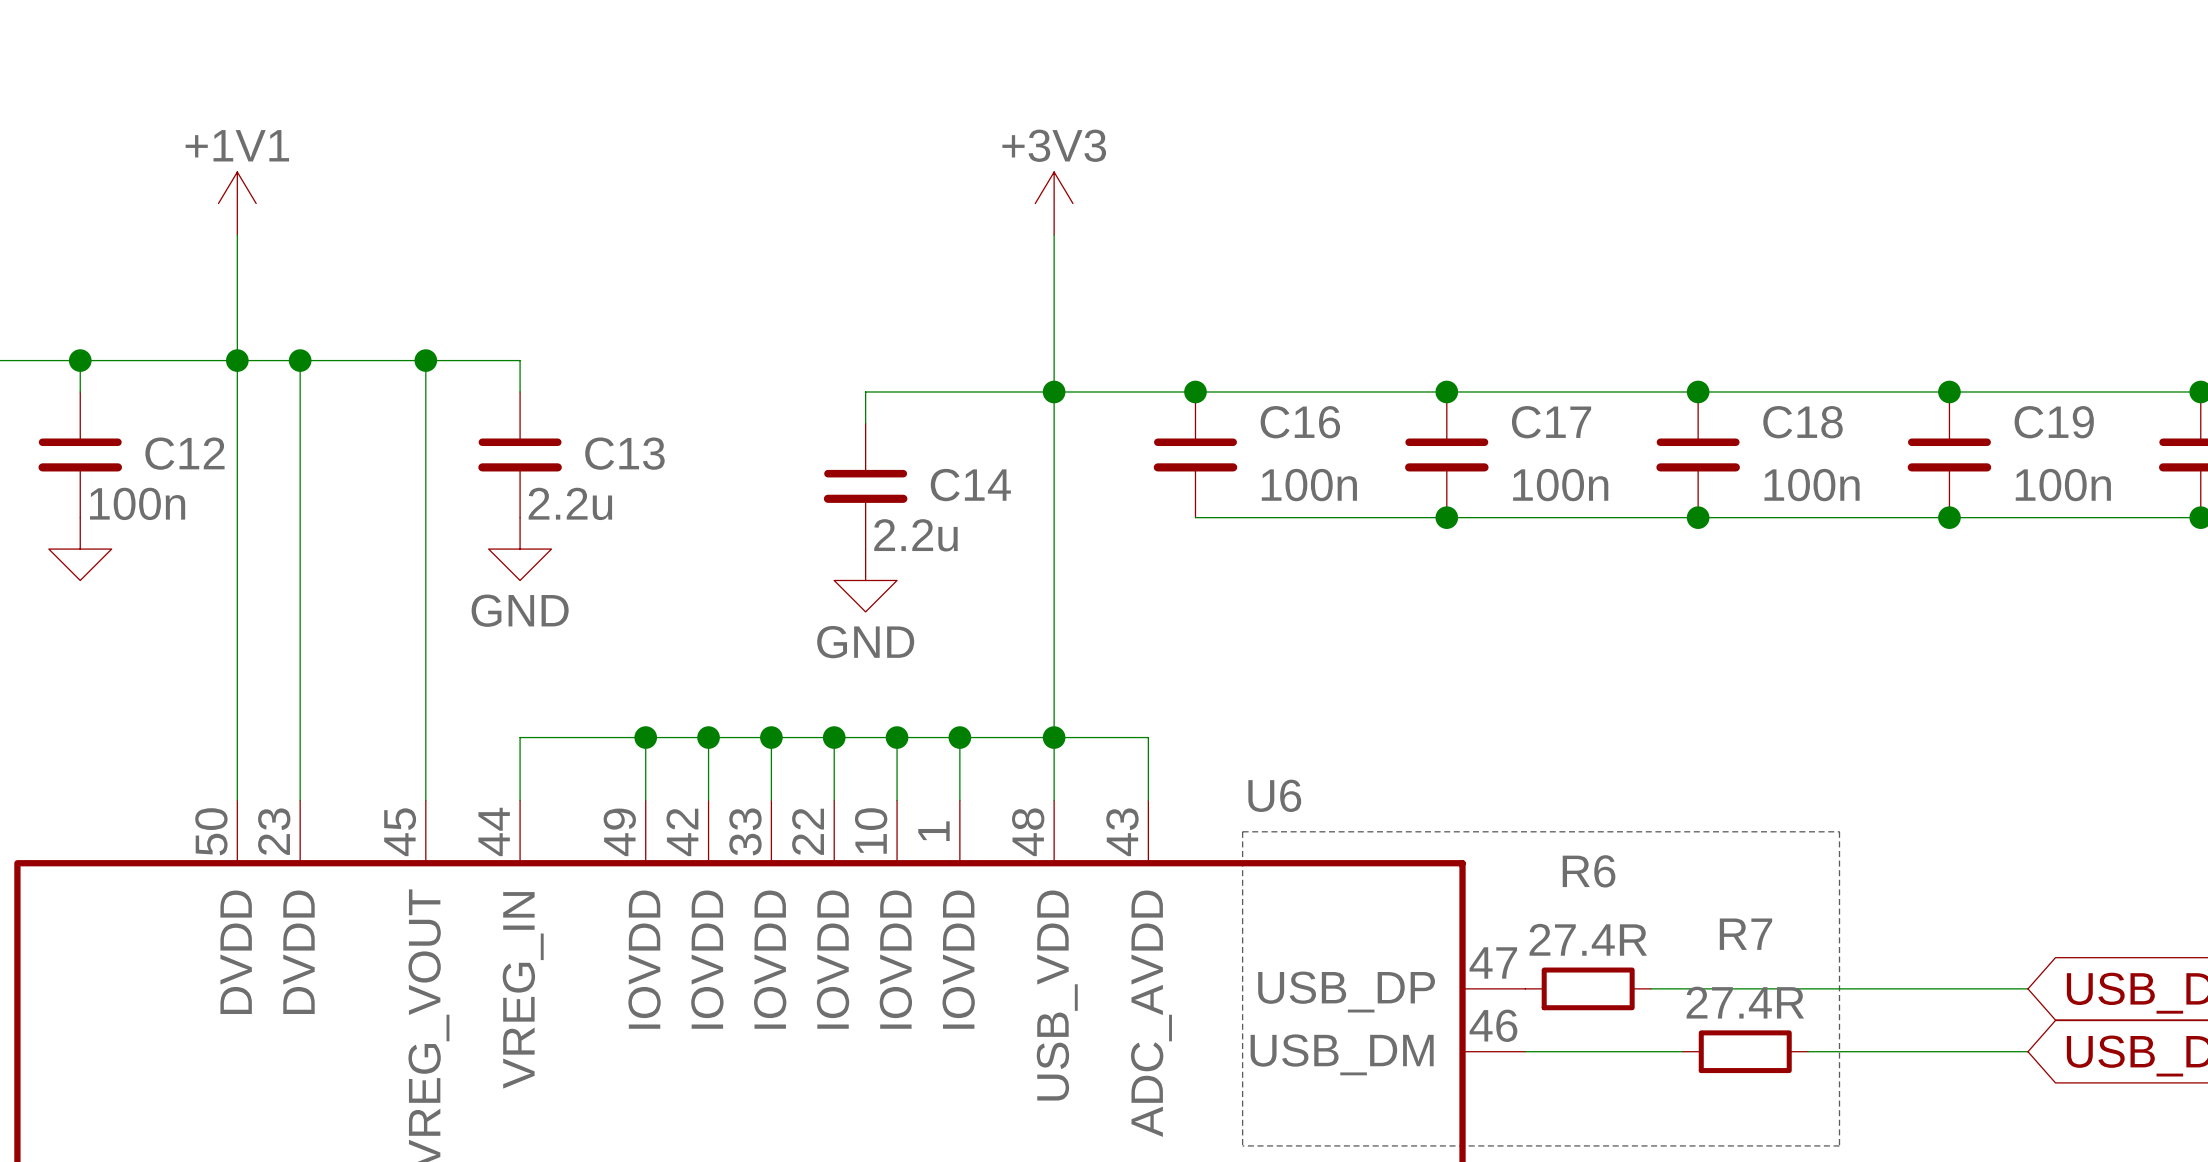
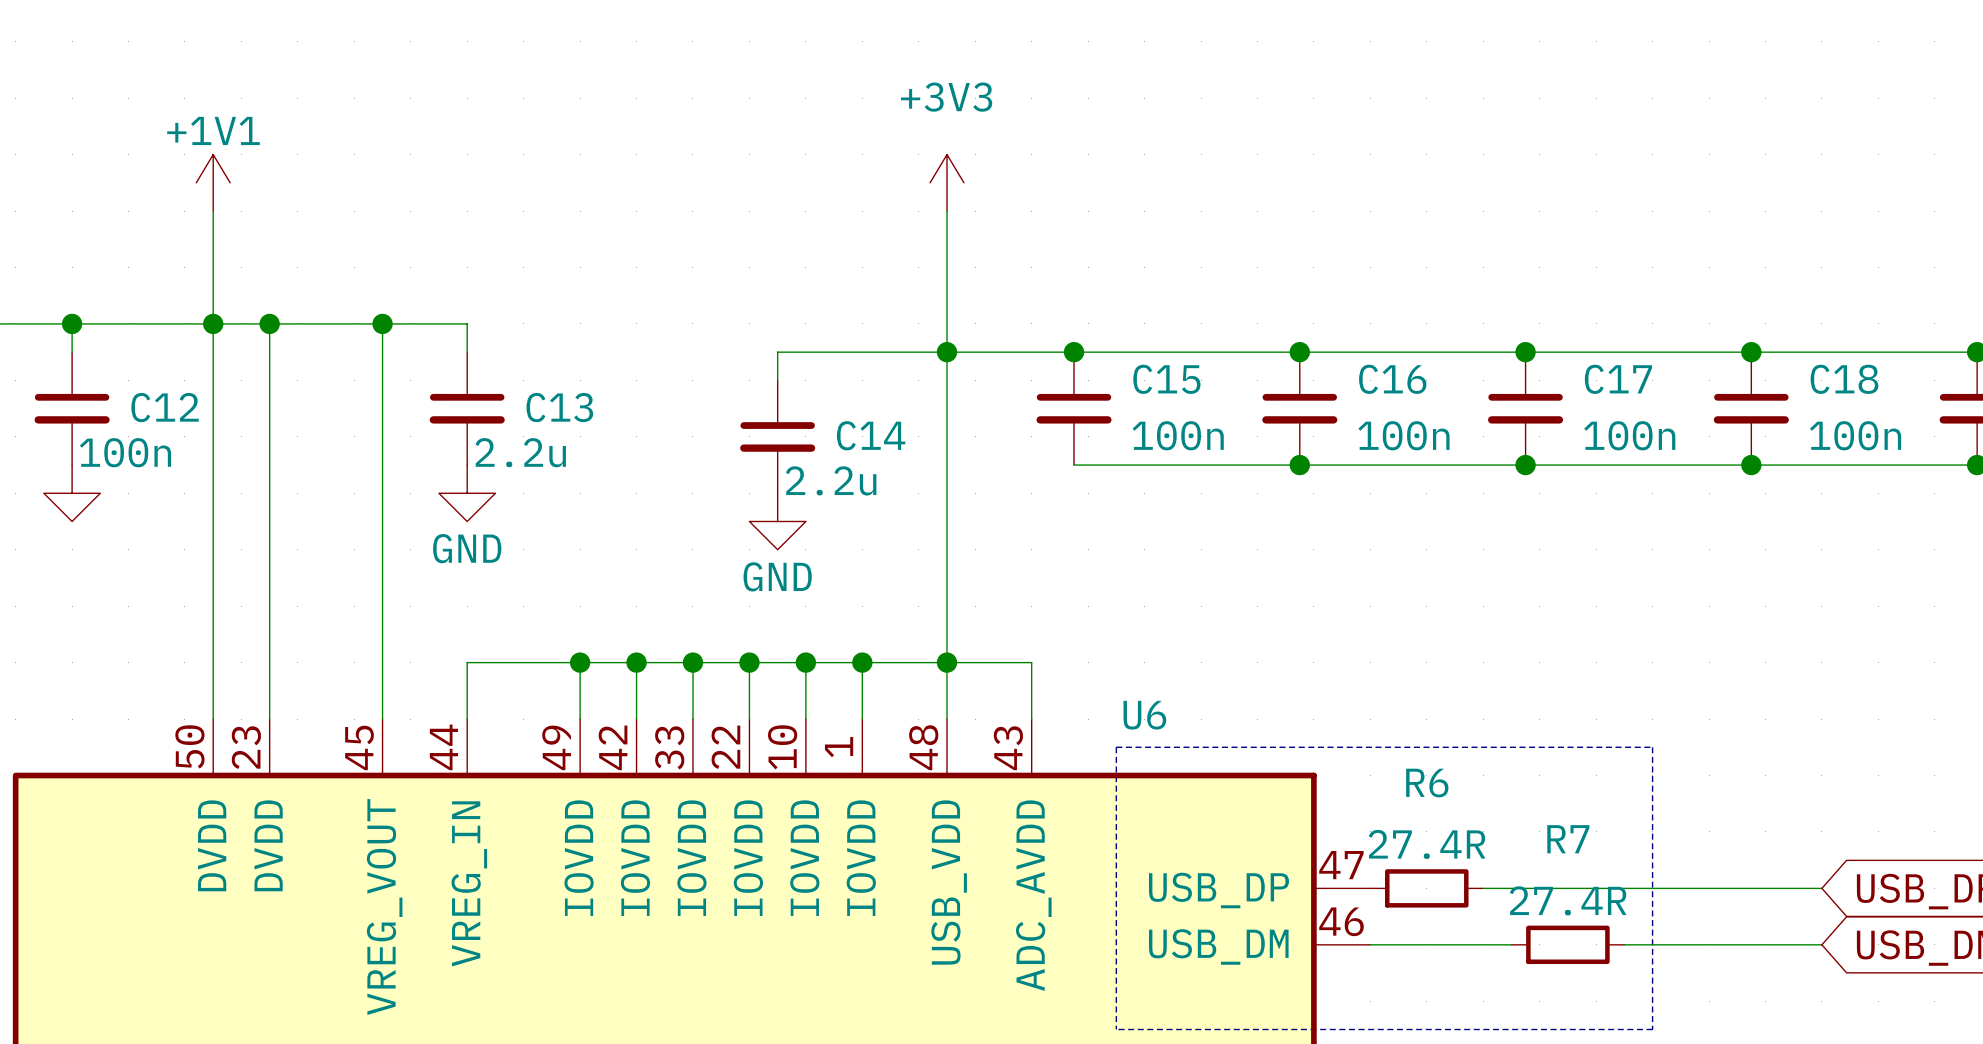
power symbol text position: +3V3 (1054, 145) -> +3V3 (946, 97)
C16 name: C16 (1300, 422) -> C15 (1166, 379)
C17 name: C17 (1551, 422) -> C16 (1392, 379)
C18 name: C18 (1803, 422) -> C17 (1618, 379)
C19 name: C19 (2054, 422) -> C18 (1844, 379)

